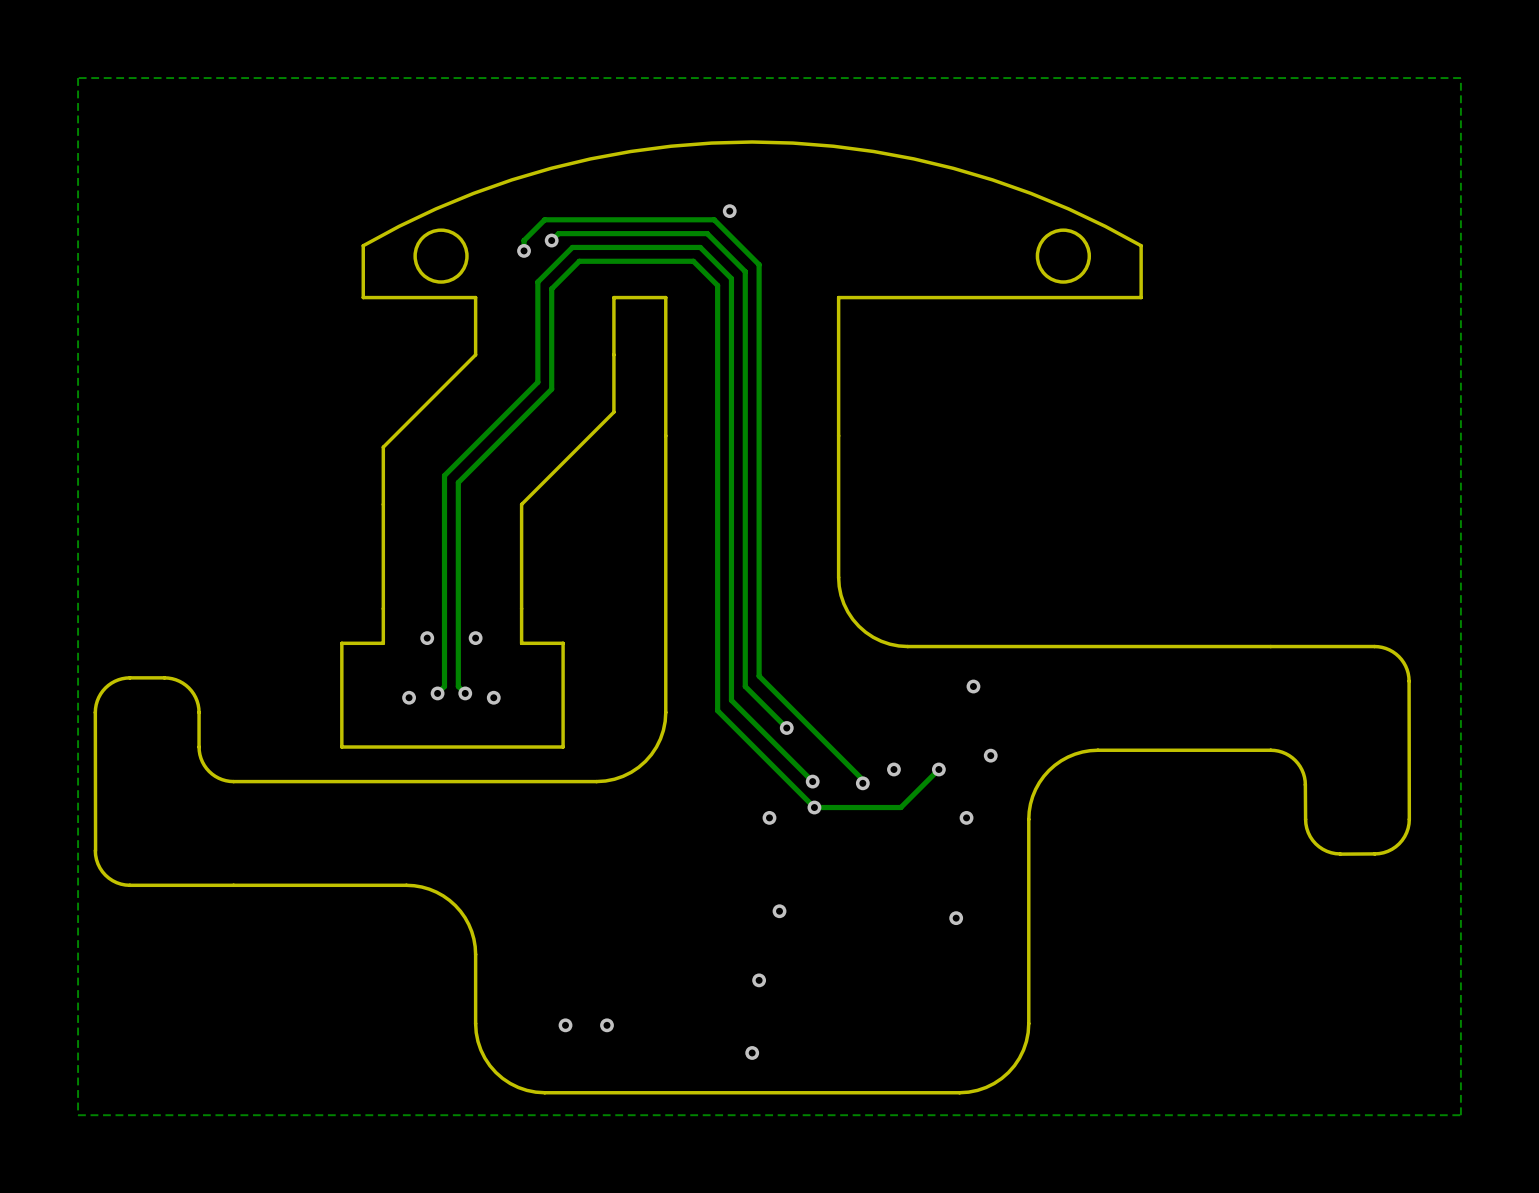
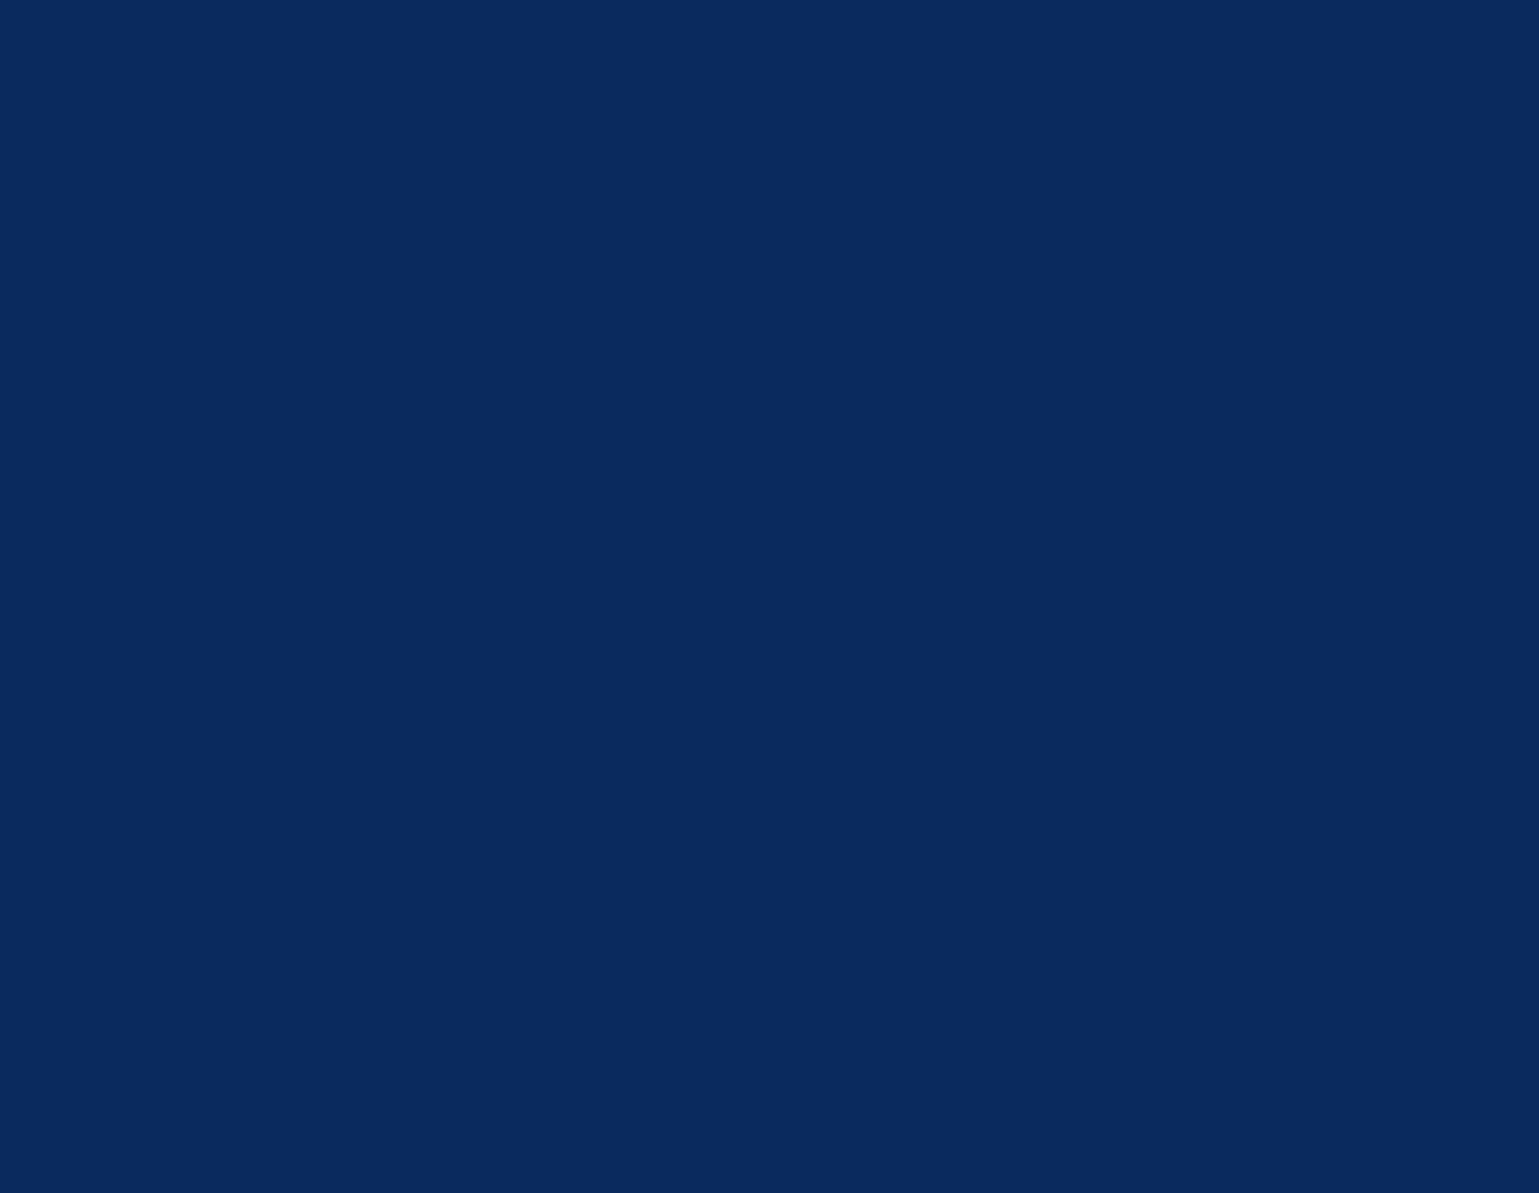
zone outline: (1460, 78) (78, 78) (78, 1115) (1460, 1115) (1460, 78) -> none
drawing: [93, 140, 1412, 1095] -> none
via: (729, 211) -> none
track: (551, 240) (558, 233) (707, 233) (745, 271) (745, 686) (786, 728) -> none
via: (551, 240) -> none
track: (524, 250) (524, 240) (544, 219) (714, 219) (759, 264) (759, 676) (862, 779) (862, 783) -> none
via: (524, 250) -> none
via: (427, 638) -> none
via: (475, 638) -> none
via: (973, 686) -> none
track: (437, 693) (444, 686) (444, 475) (537, 382) (537, 282) (572, 247) (700, 247) (731, 278) (731, 700) (812, 781) -> none
via: (437, 693) -> none
track: (465, 693) (458, 686) (458, 482) (551, 389) (551, 288) (579, 261) (693, 261) (717, 285) (717, 710) (814, 807) (900, 807) (938, 769) -> none
via: (465, 693) -> none
via: (409, 697) -> none
via: (493, 697) -> none
via: (786, 728) -> none
via: (990, 755) -> none
via: (893, 769) -> none
via: (938, 769) -> none
via: (812, 781) -> none
via: (862, 783) -> none
via: (814, 807) -> none
via: (769, 817) -> none
via: (966, 817) -> none
via: (779, 911) -> none
via: (956, 918) -> none
via: (759, 980) -> none
via: (565, 1025) -> none
via: (607, 1025) -> none
via: (752, 1052) -> none

